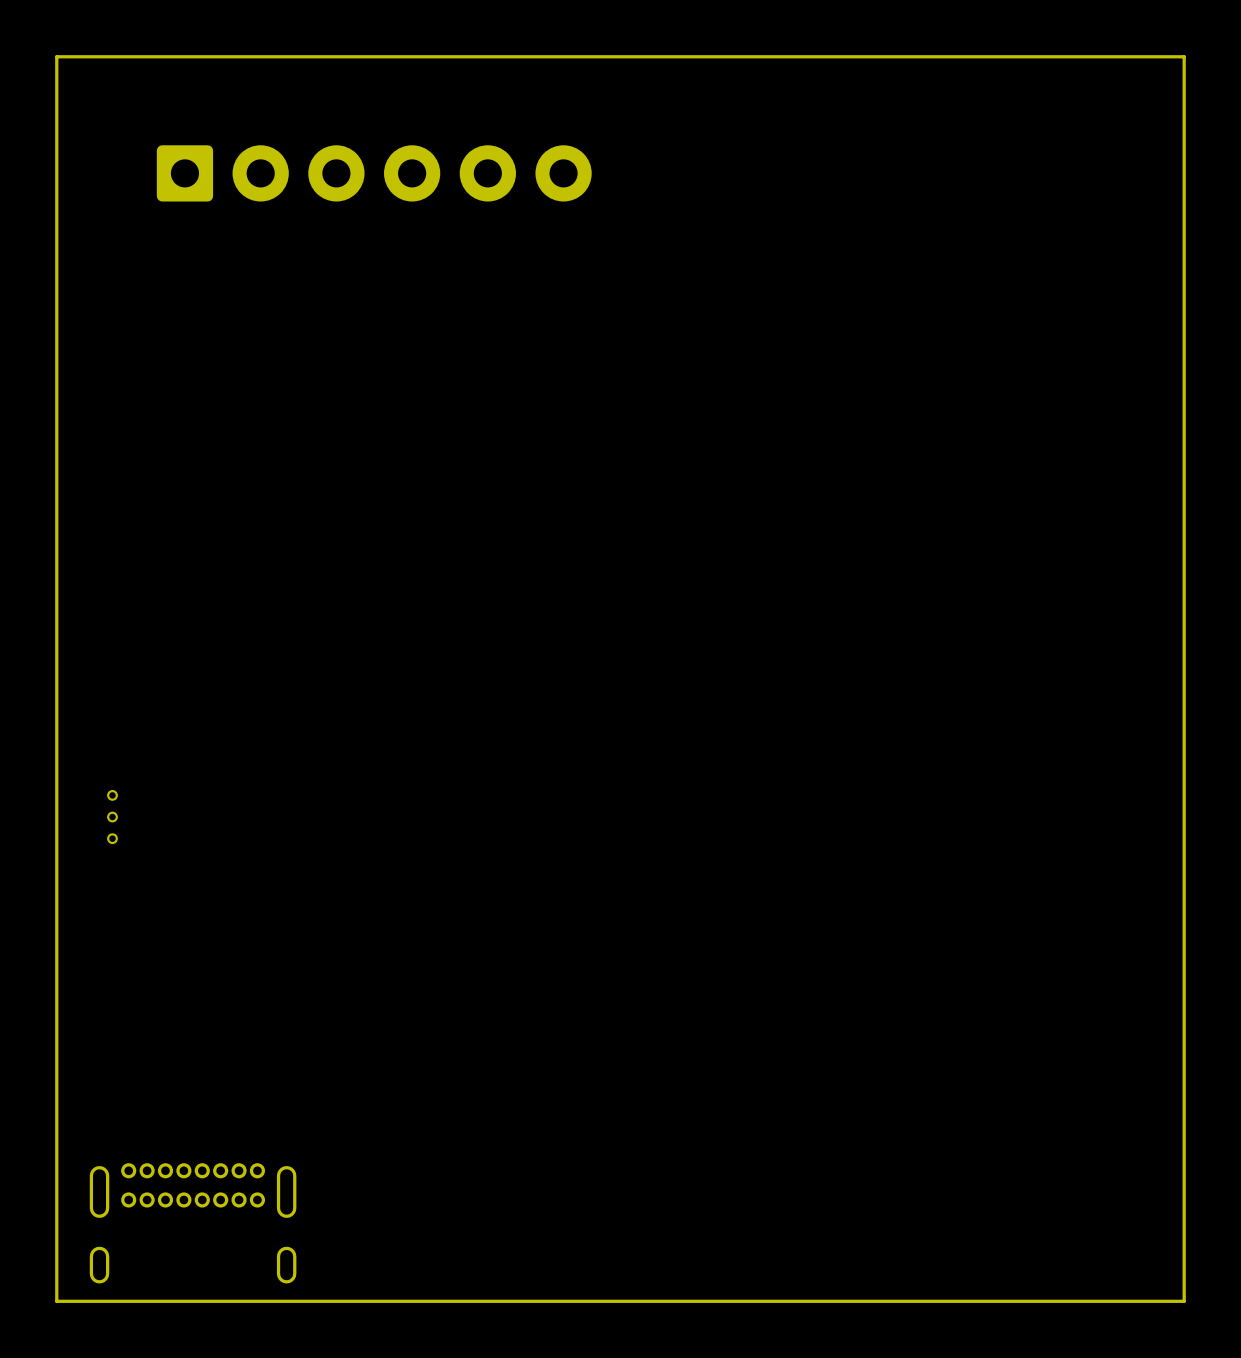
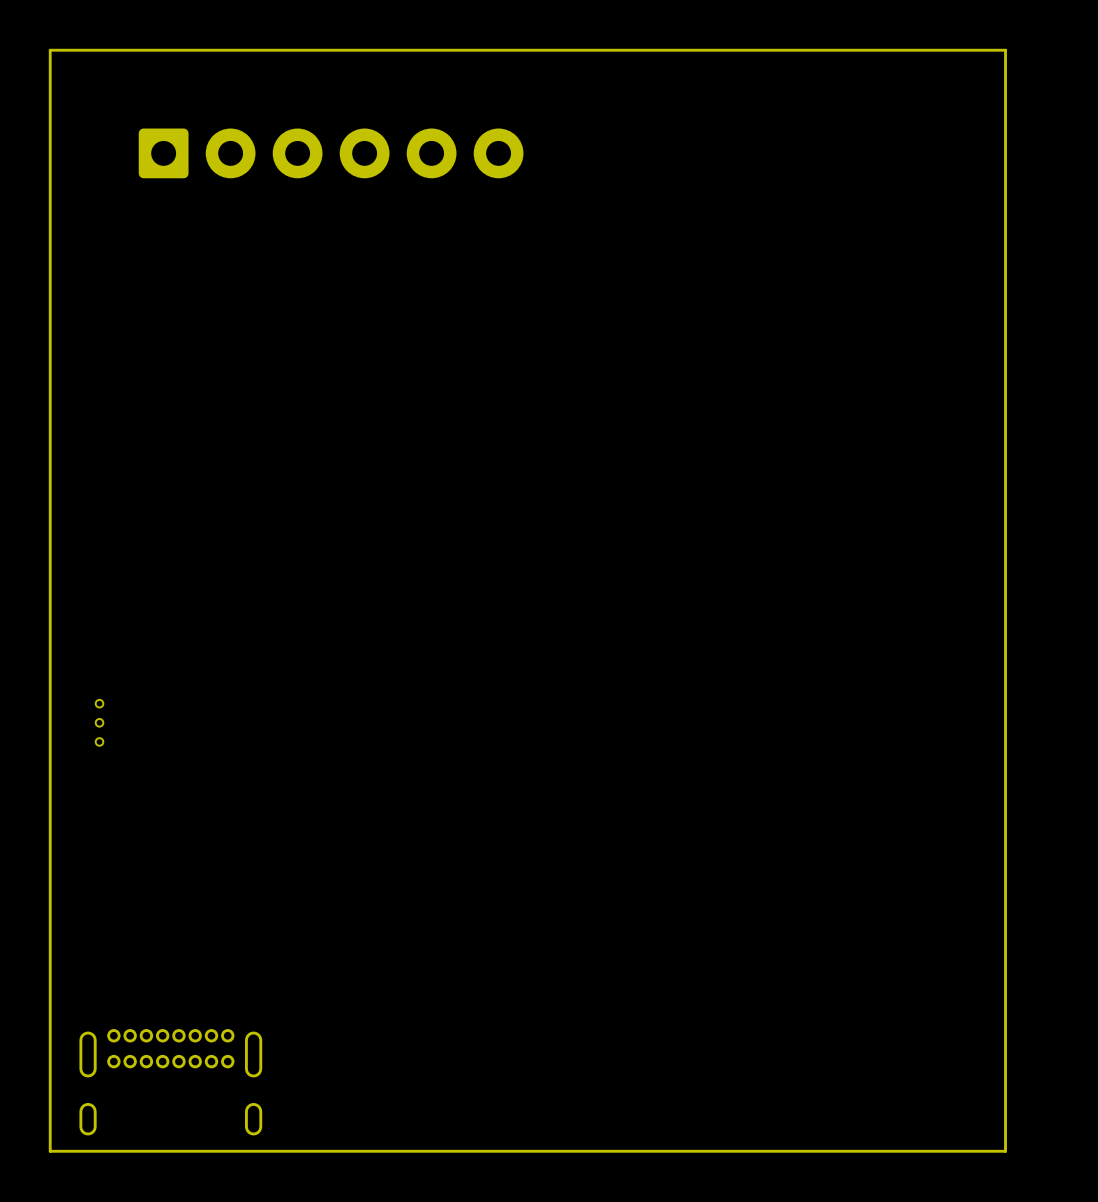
board edge: (1136, 56) (1184, 56) (1184, 1301) (1136, 1301) -> (1005, 50) (1005, 1151)

